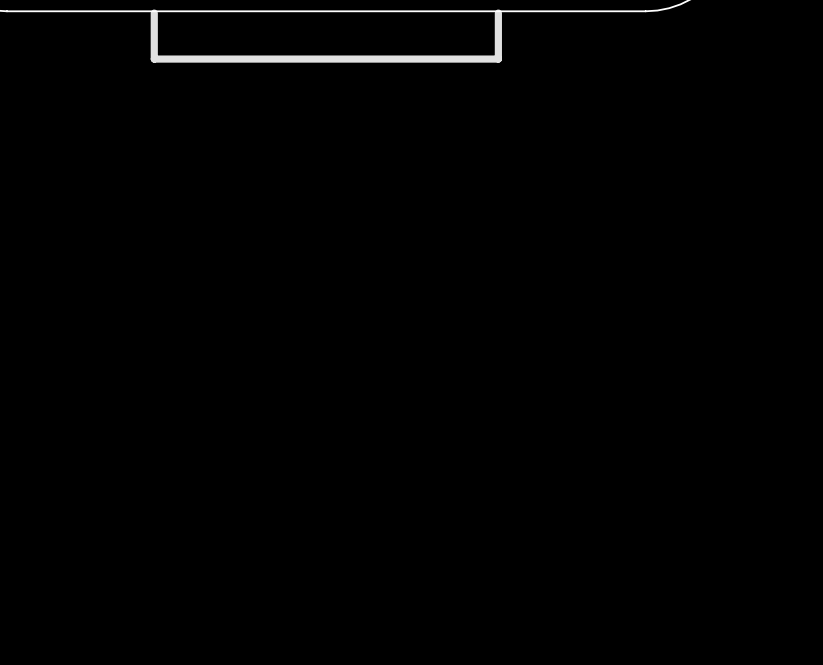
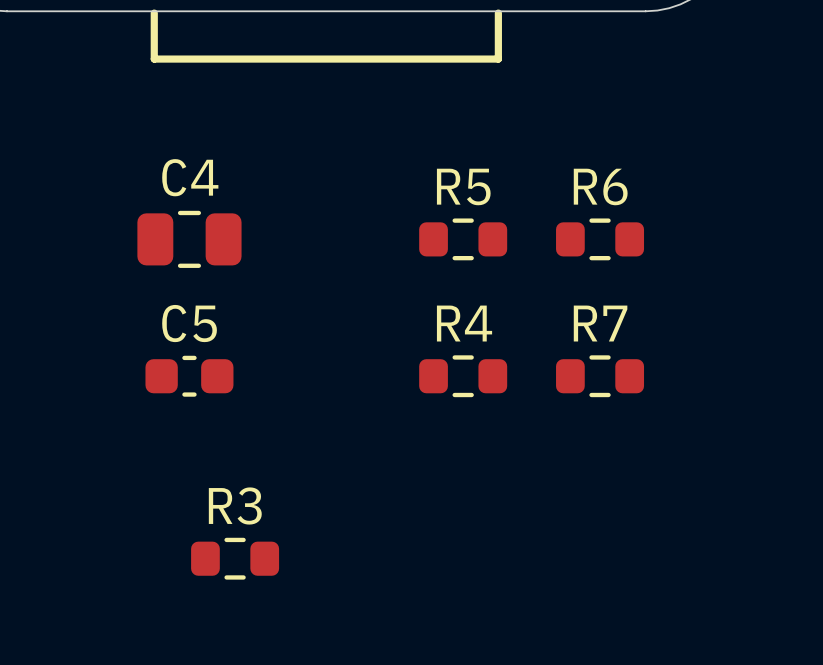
C4: none -> (189, 239)
R5: none -> (463, 239)
R6: none -> (600, 239)
C5: none -> (189, 376)
R4: none -> (463, 376)
R7: none -> (600, 376)
R3: none -> (235, 558)

